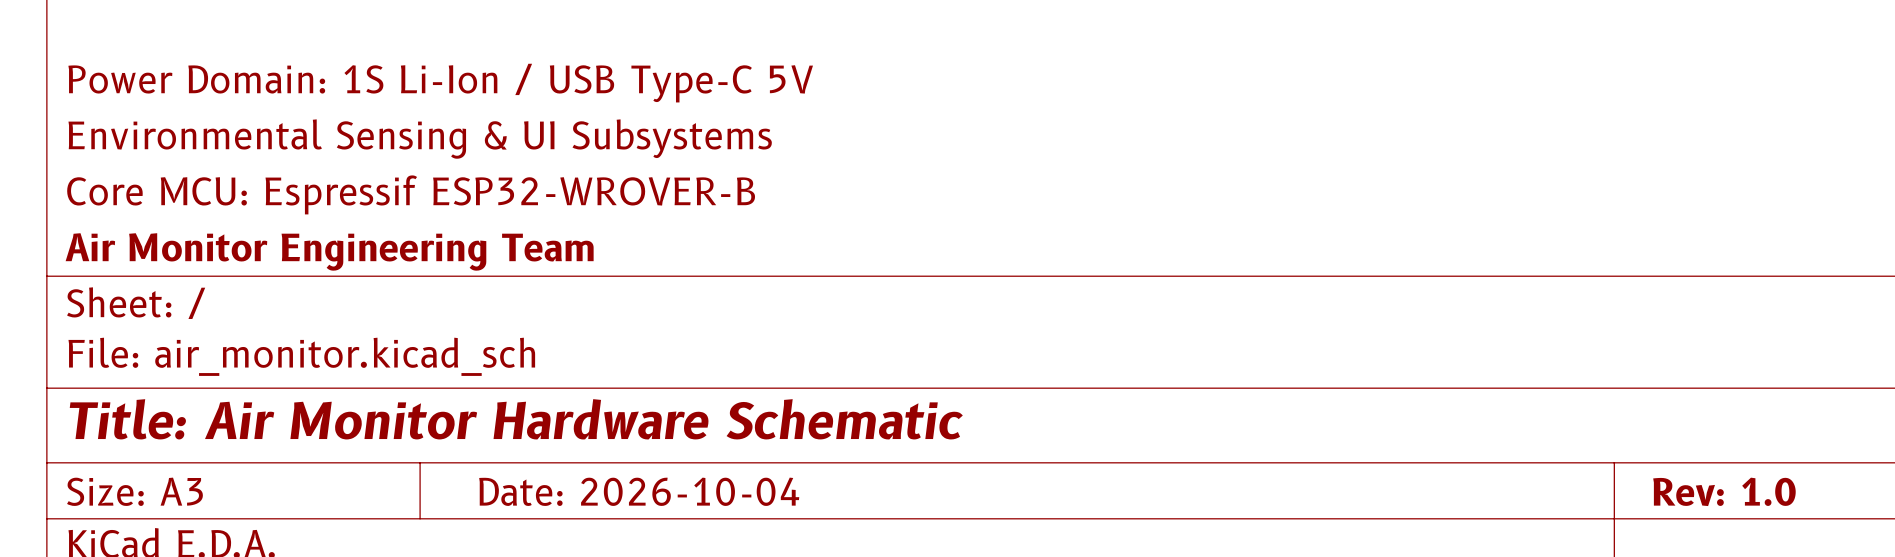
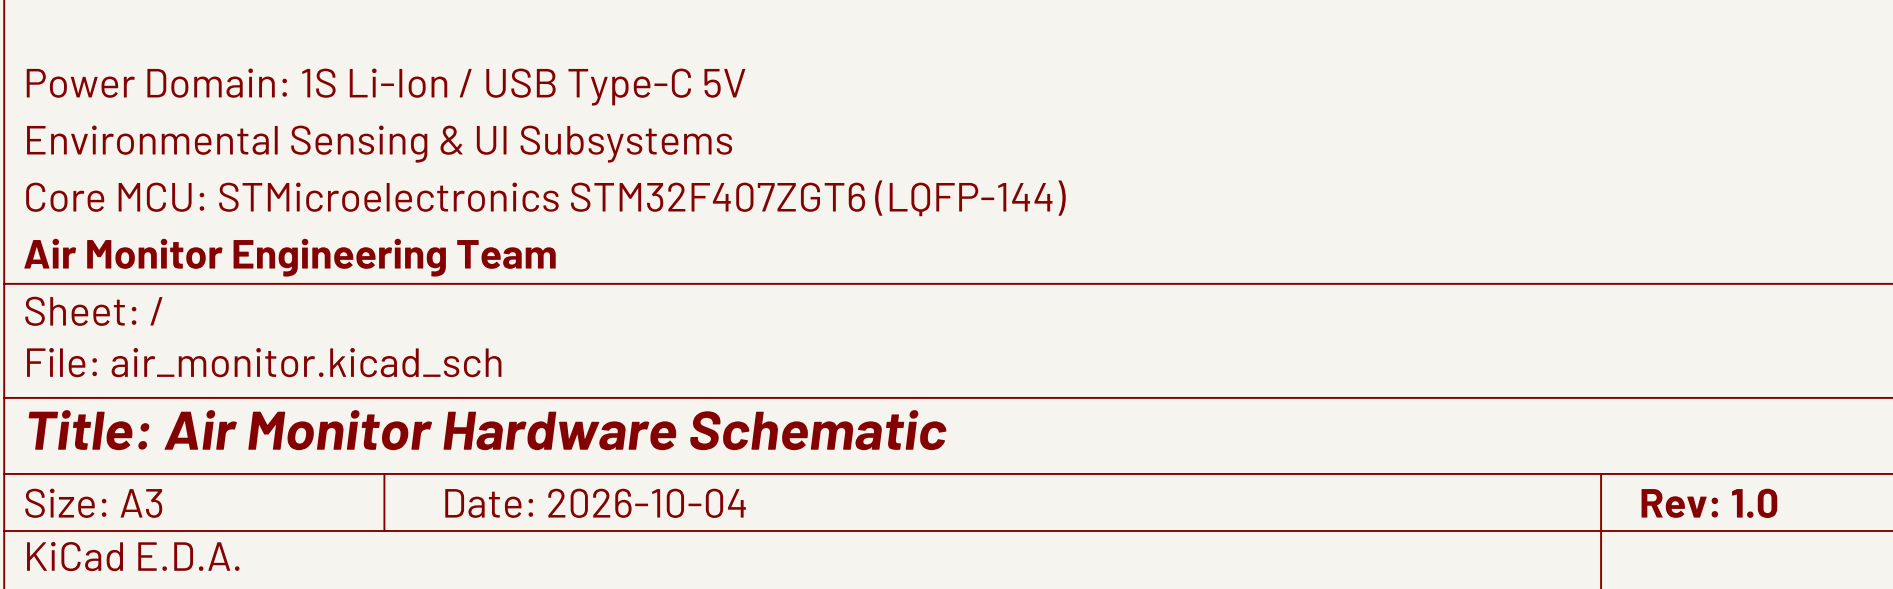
title block: Core MCU: Espressif ESP32-WROVER-B (411, 194) -> Core MCU: STMicroelectronics STM32F407ZGT6 (LQFP-144) (545, 198)

